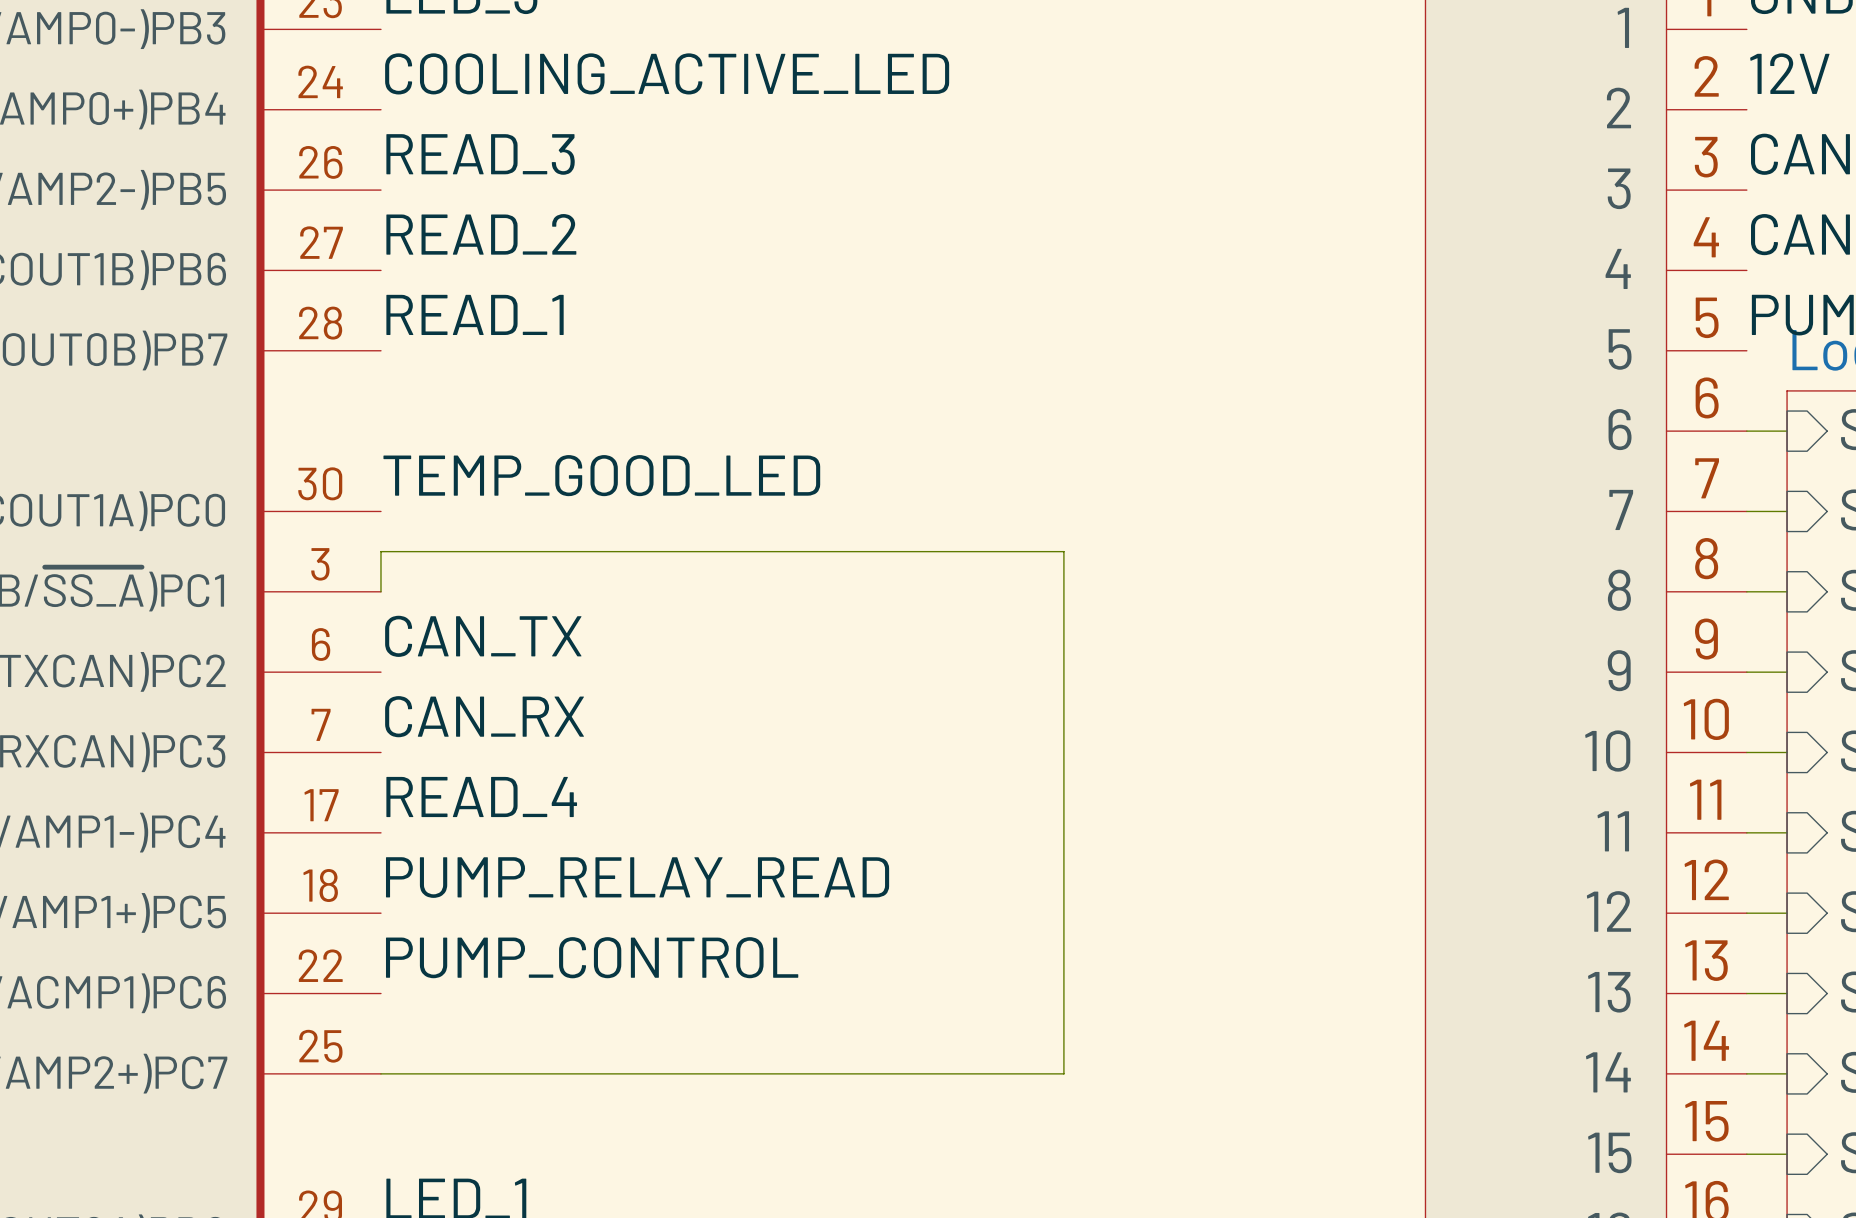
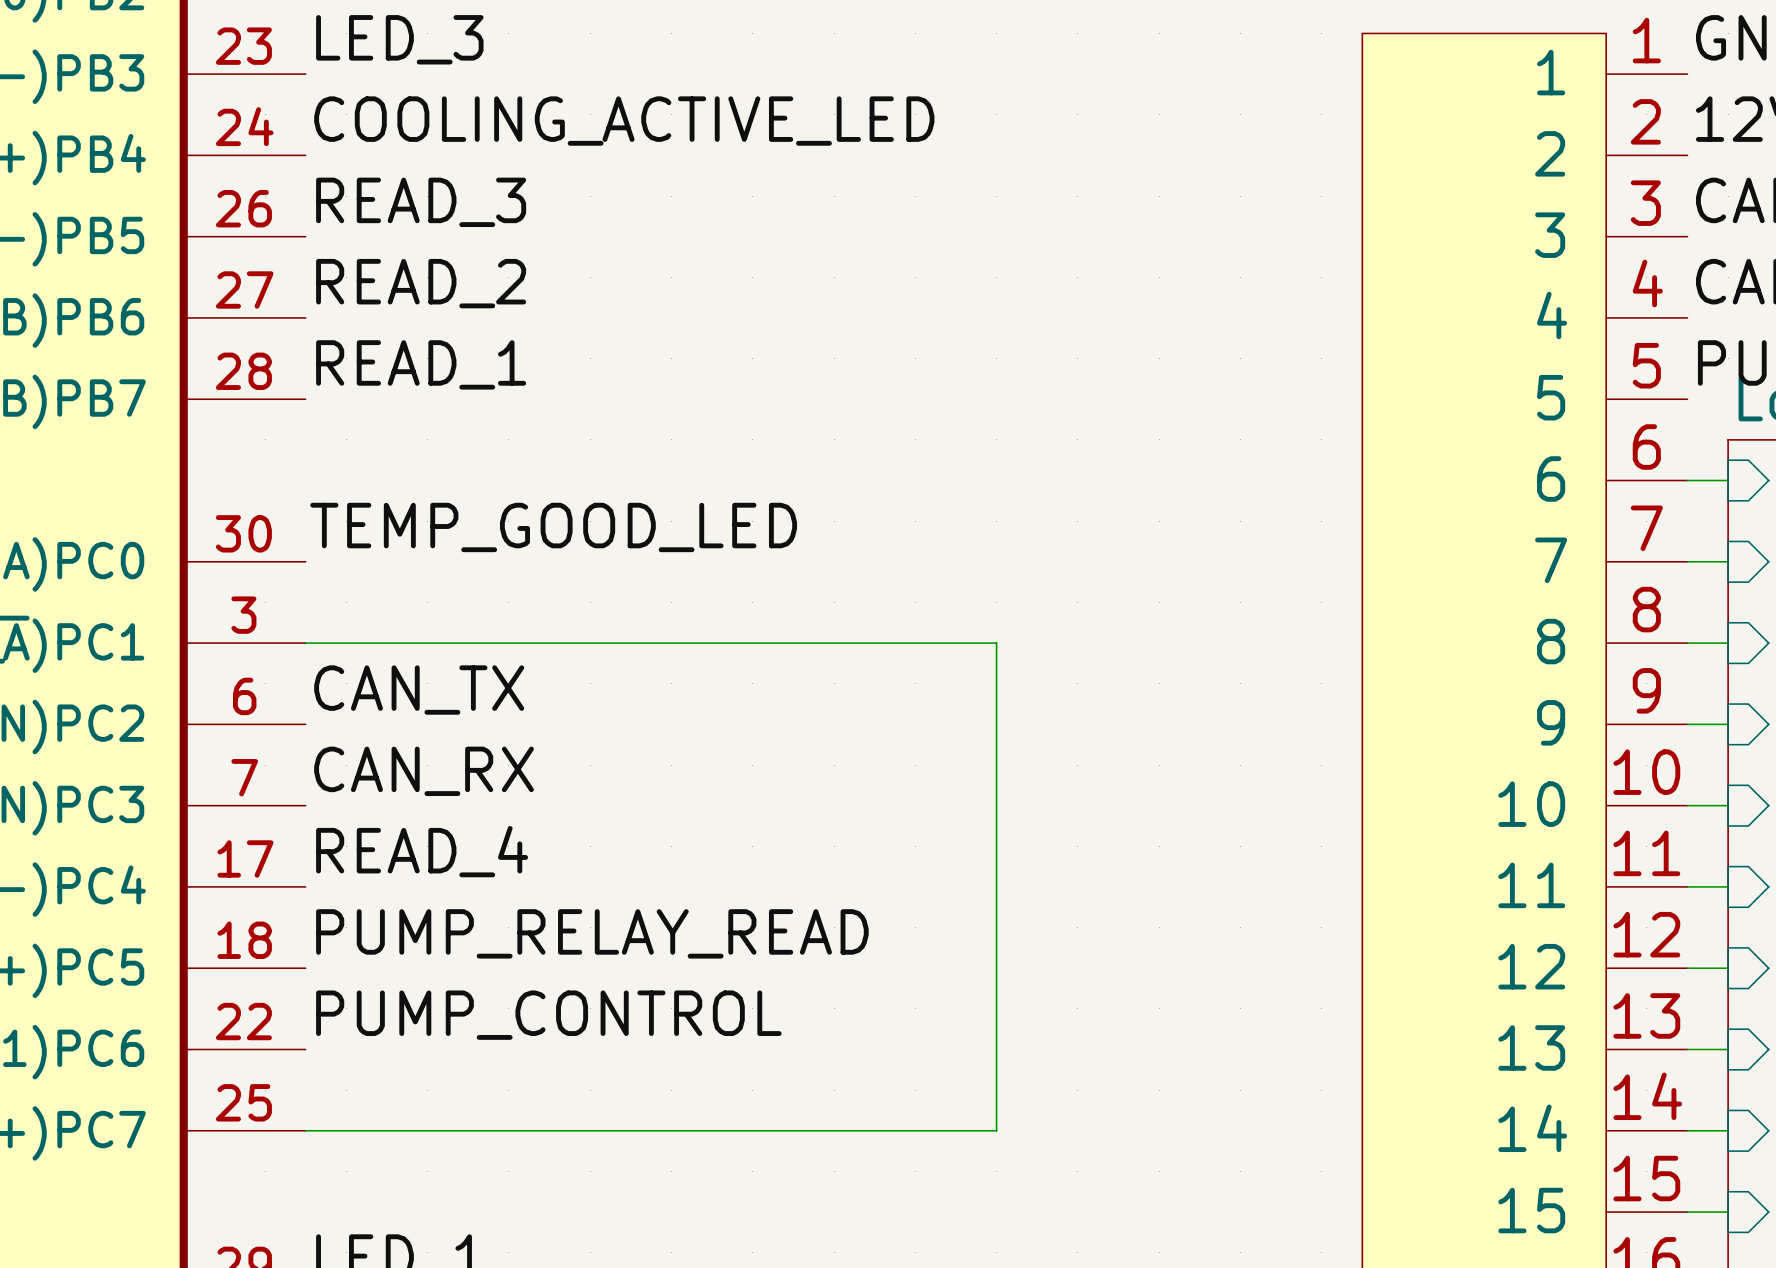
wire: (380, 591) (380, 551) (1063, 551) (1063, 591) -> (305, 643) (996, 643)

